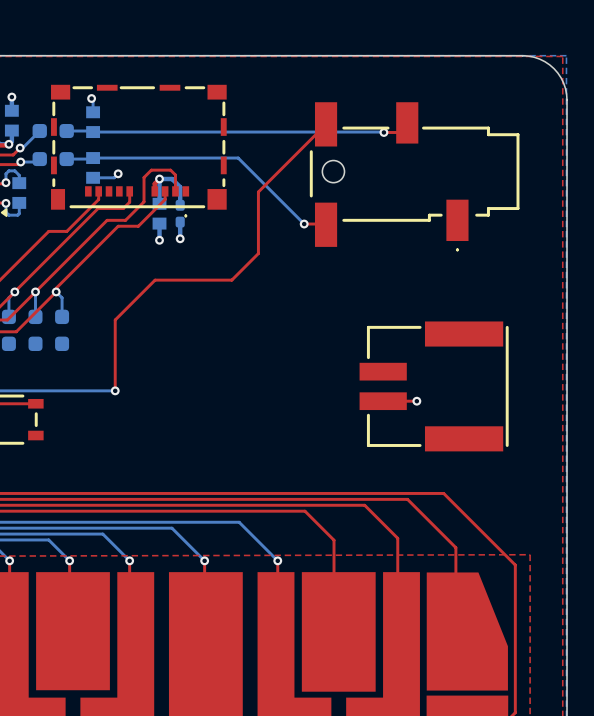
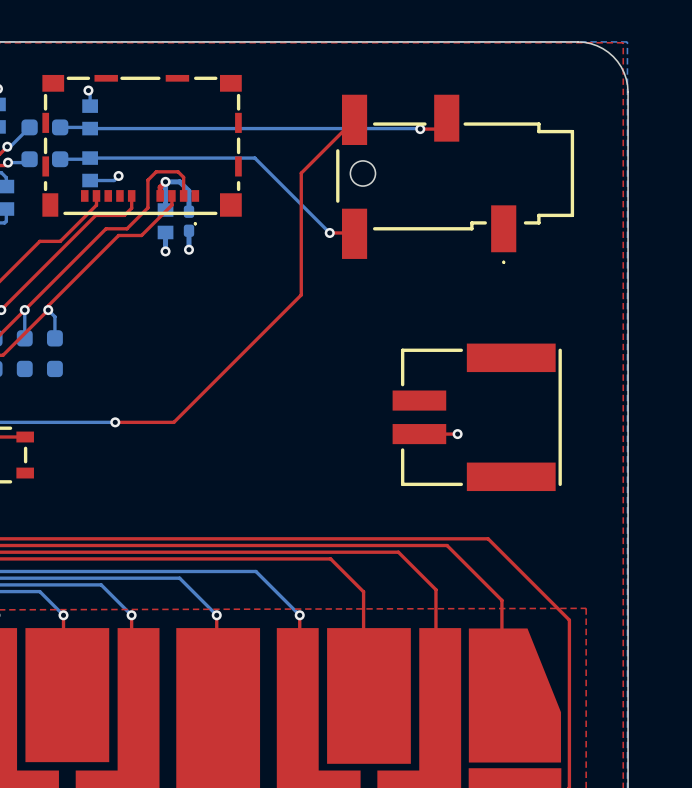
top track: (279, 171) (258, 191) (258, 253) (231, 280) (155, 280) (115, 319) (115, 390) -> (301, 173) (301, 294) (173, 422) (115, 422)

